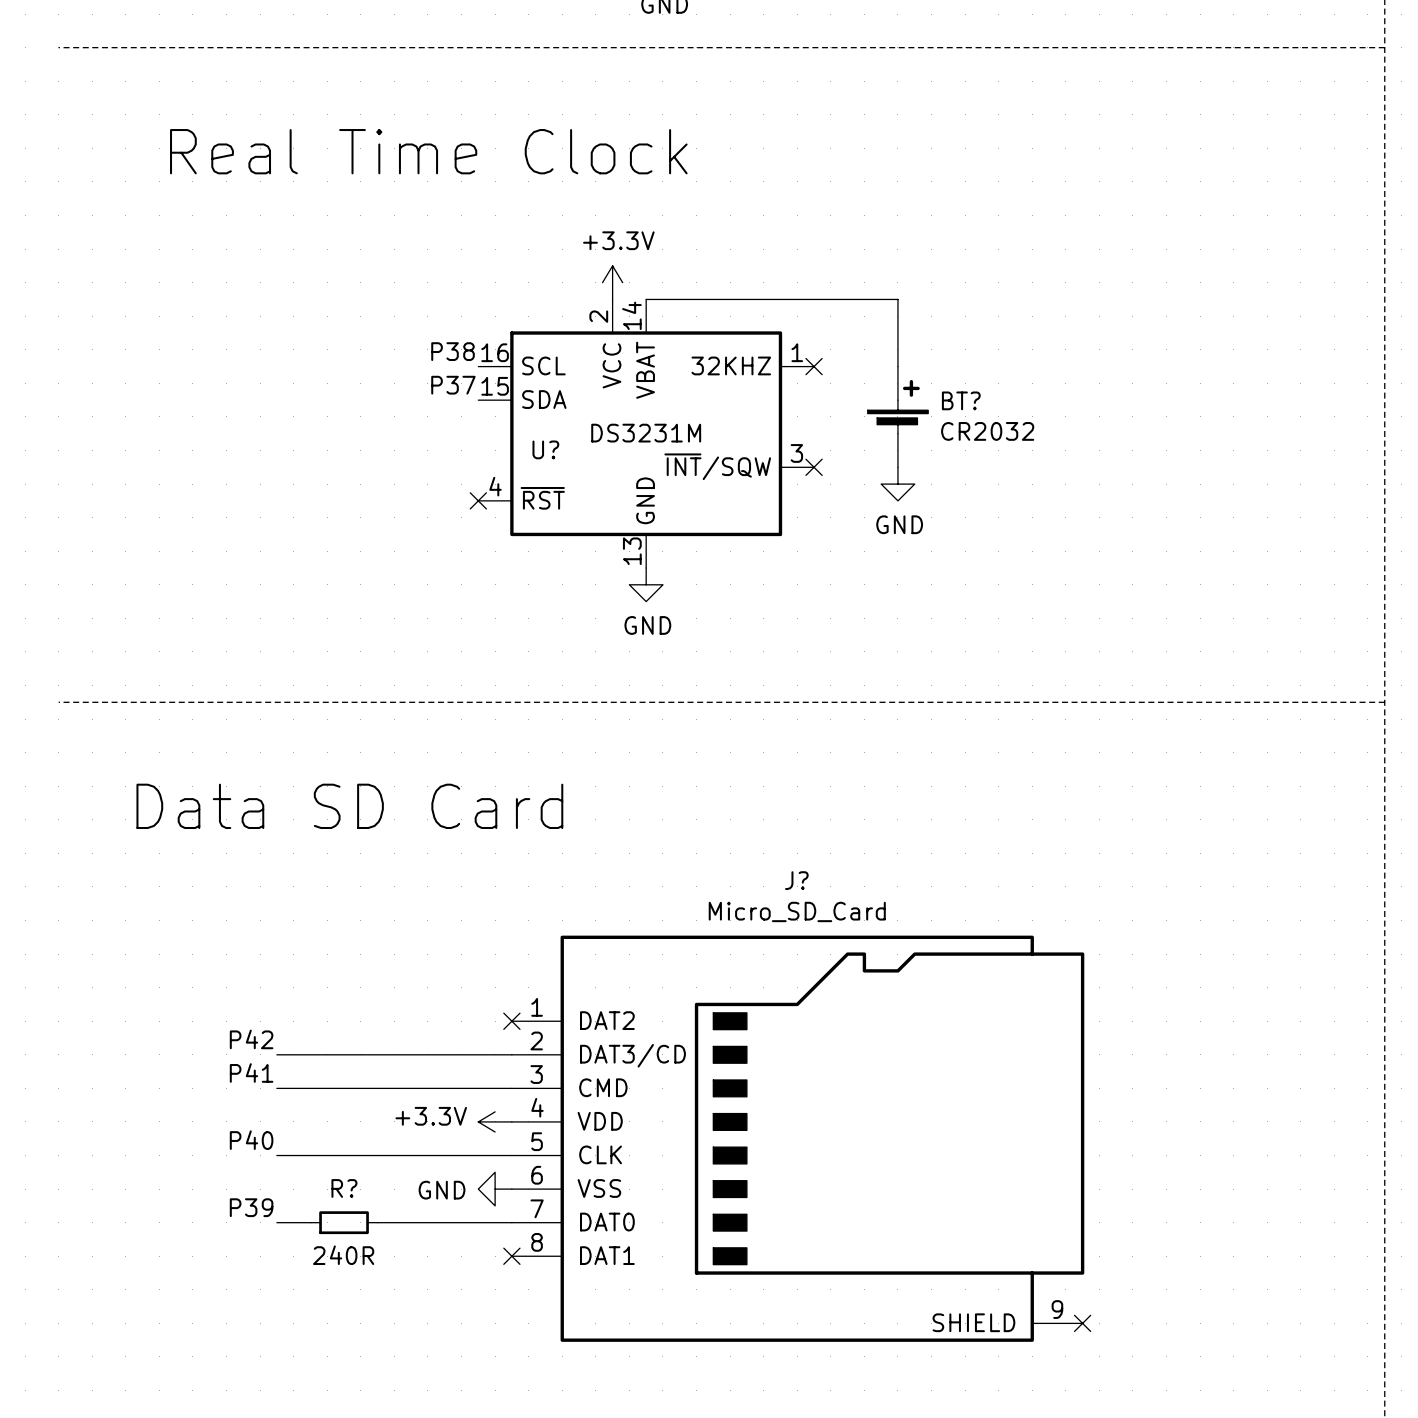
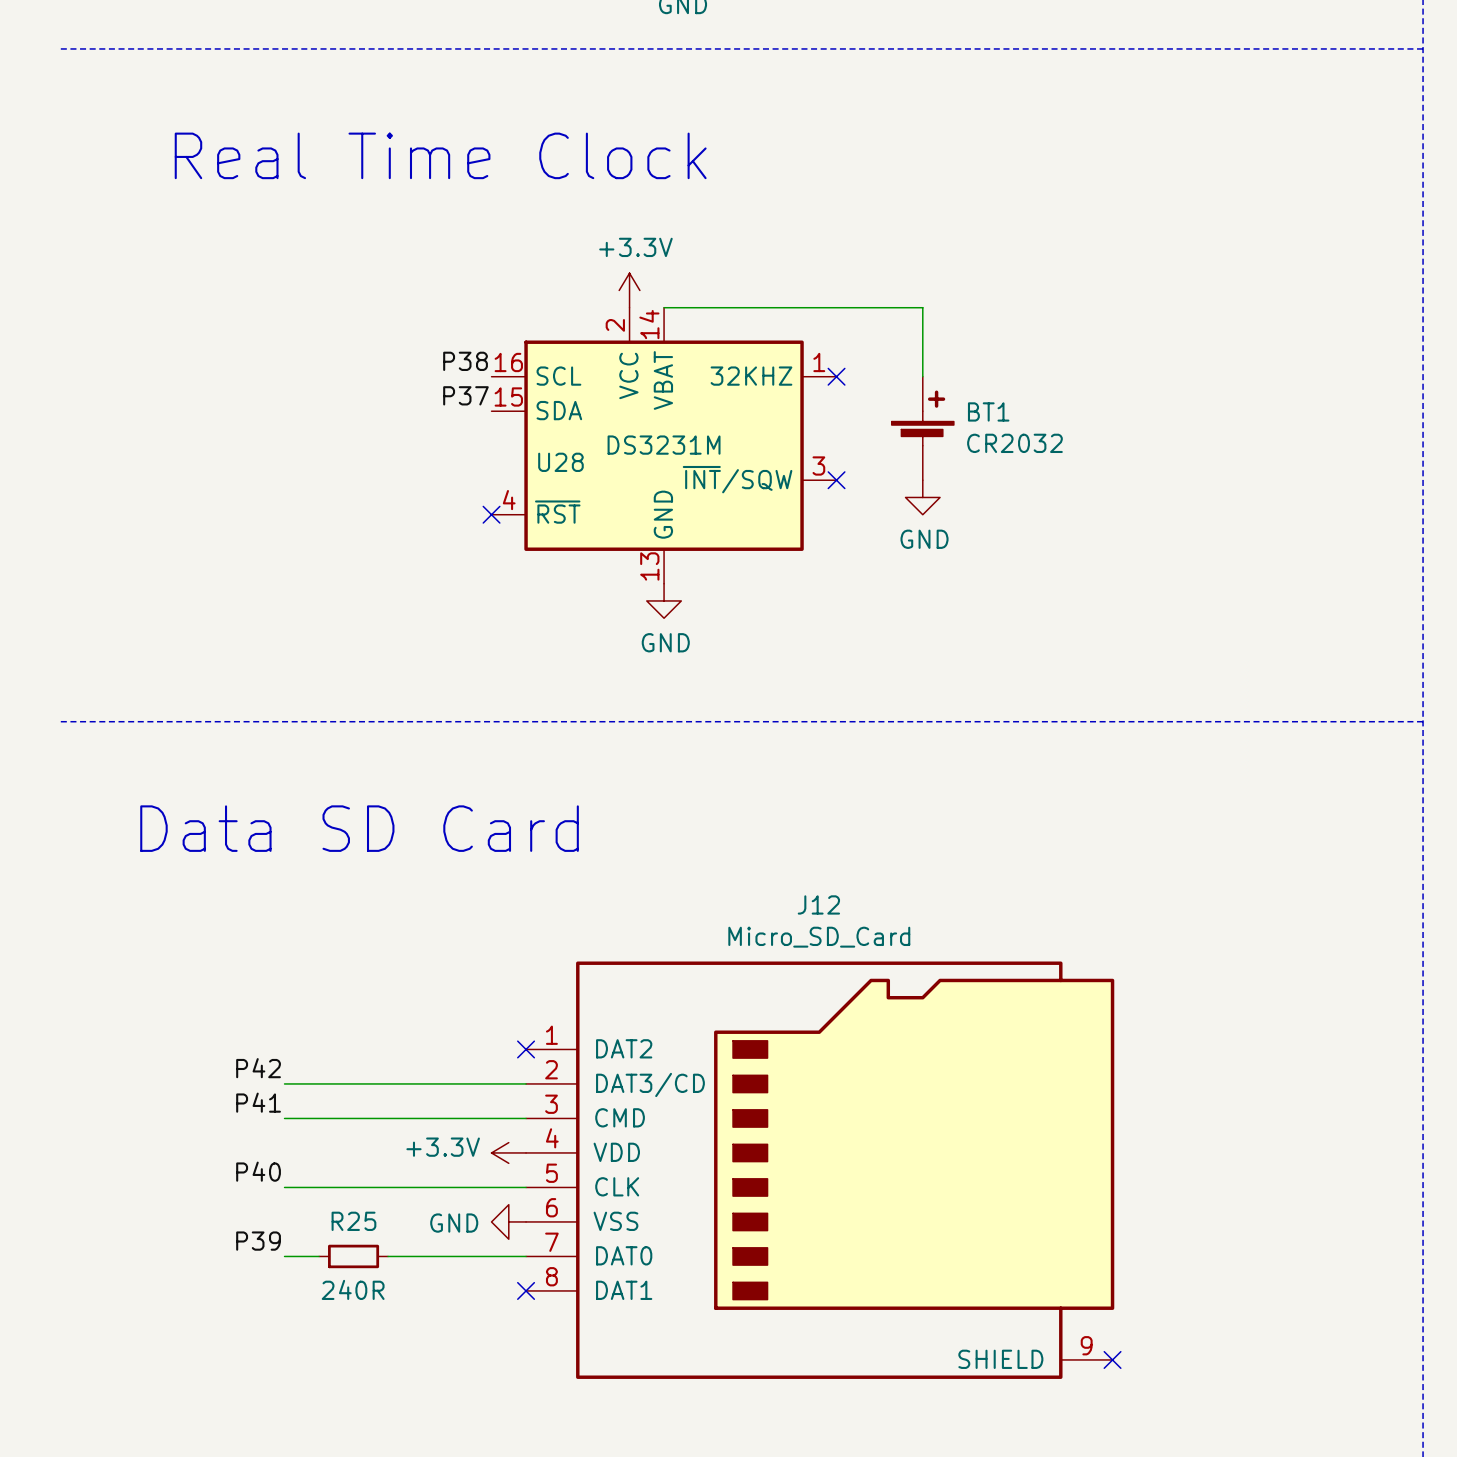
BT? name: BT? (961, 400) -> BT1 (988, 411)
U? name: U? (545, 449) -> U28 (560, 462)
J? name: J? (796, 880) -> J12 (818, 904)
R? name: R? (344, 1188) -> R25 (353, 1221)

